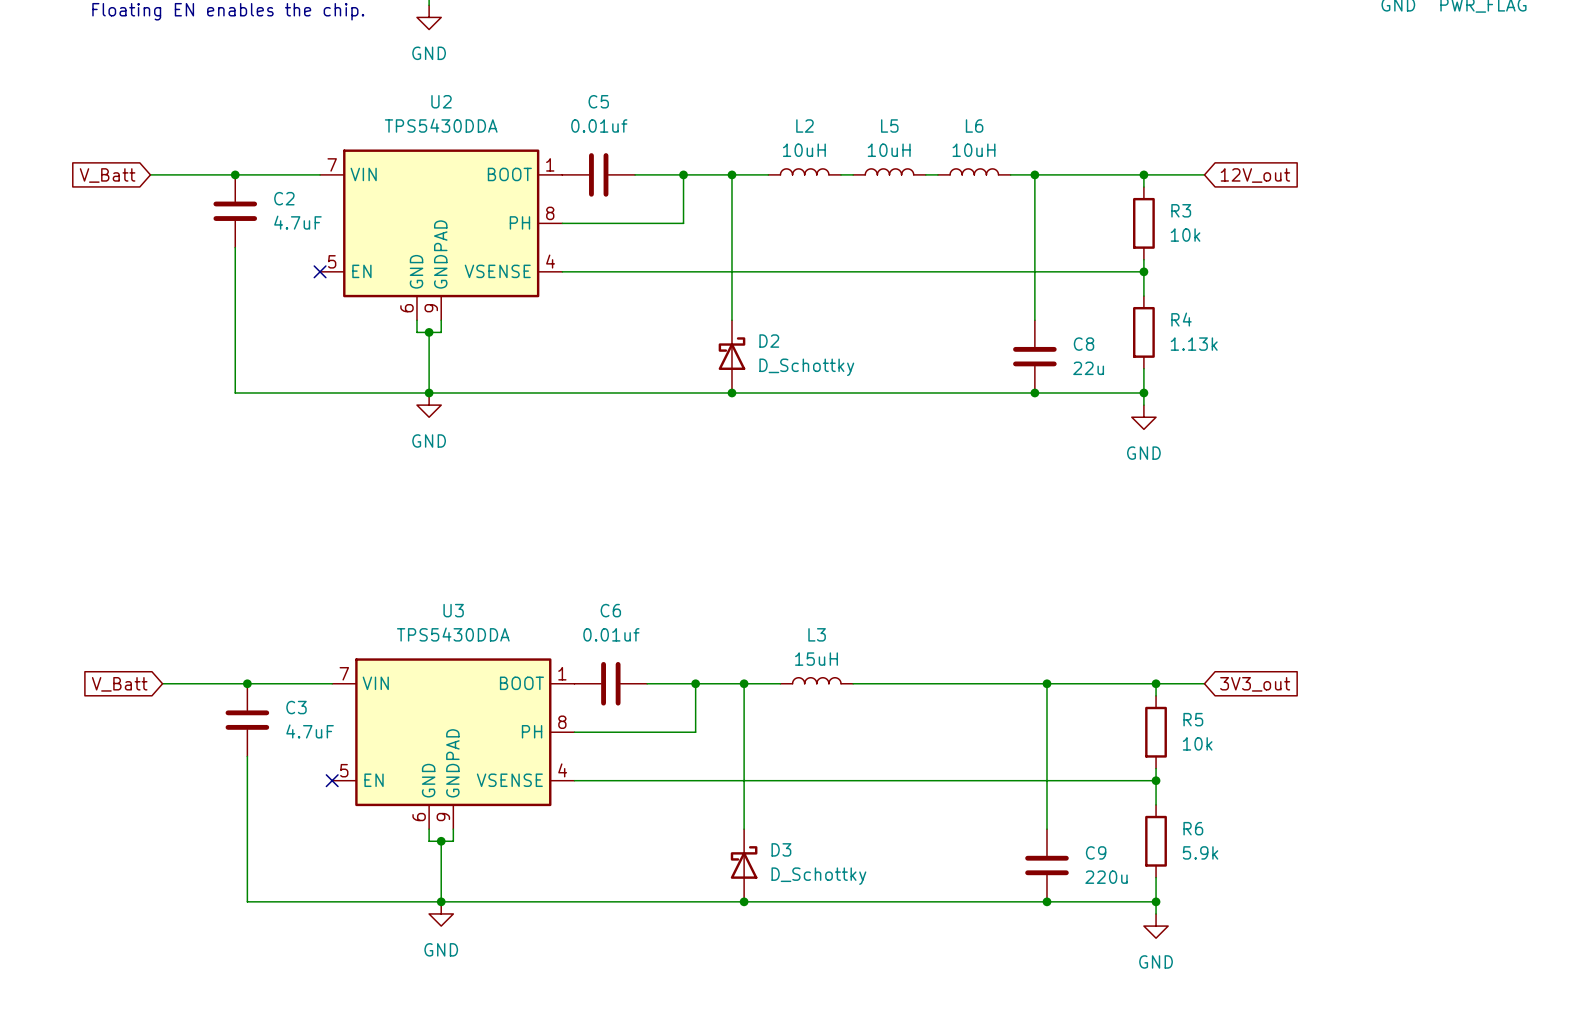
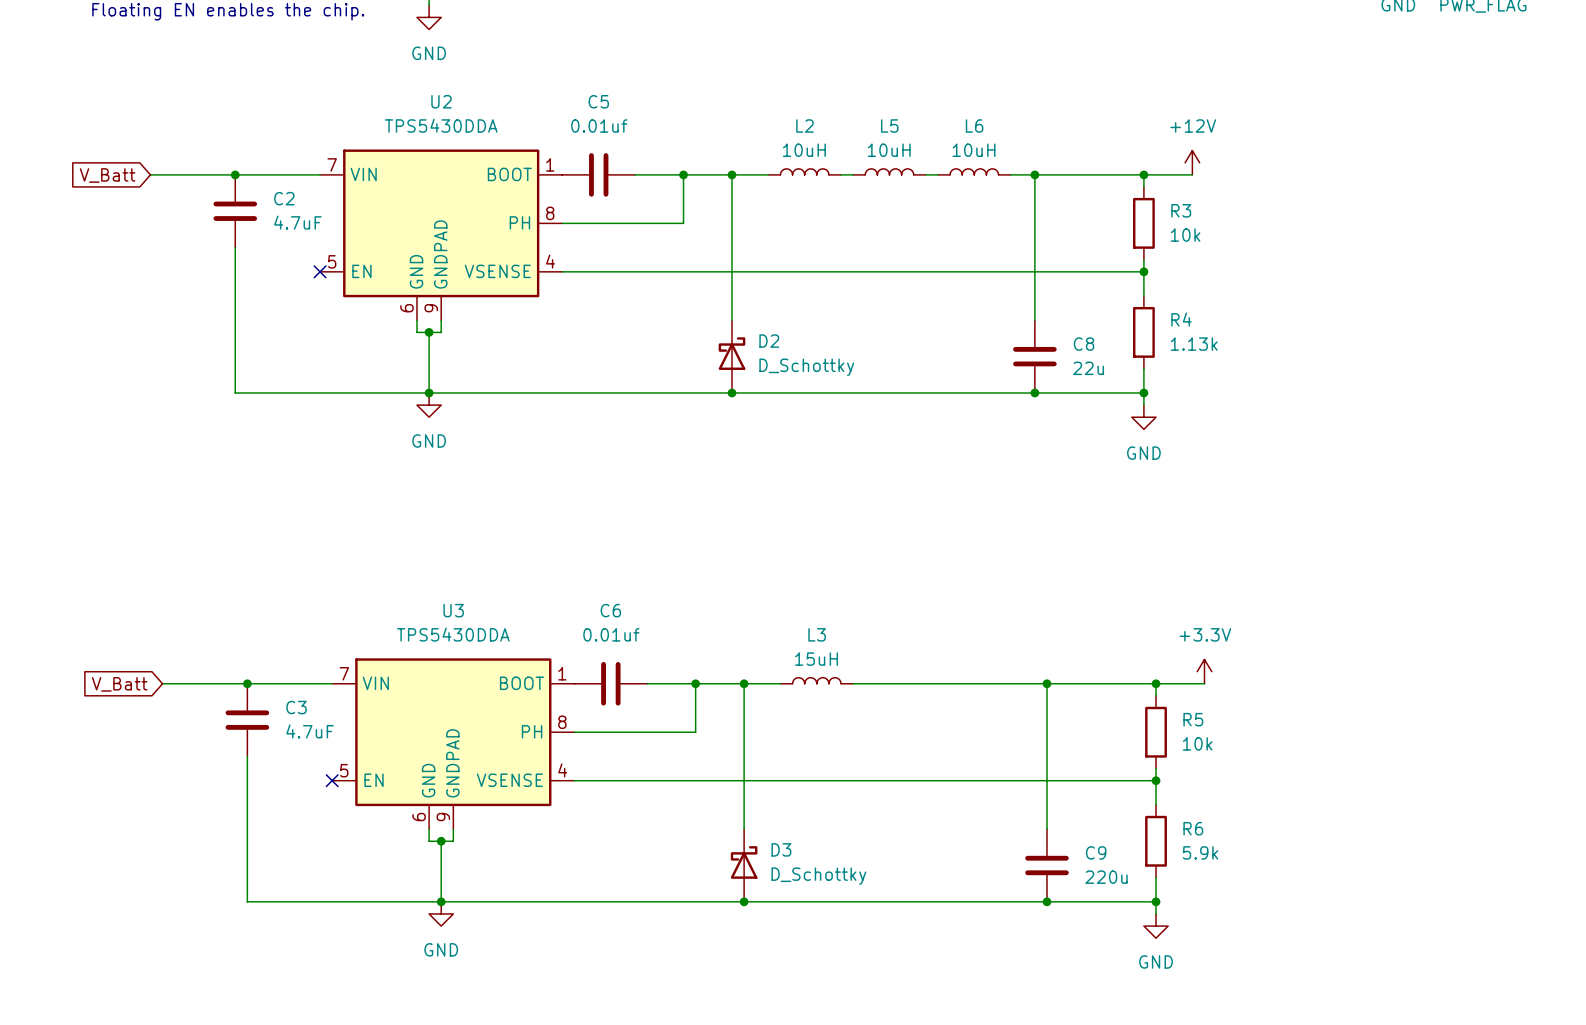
power symbol: none -> +12V (1192, 162)
wire: (1192, 174) (1204, 174) -> none
global label: 12V_out (1255, 175) -> none
power symbol: none -> +3.3V (1204, 671)
global label: 3V3_out (1255, 684) -> none

